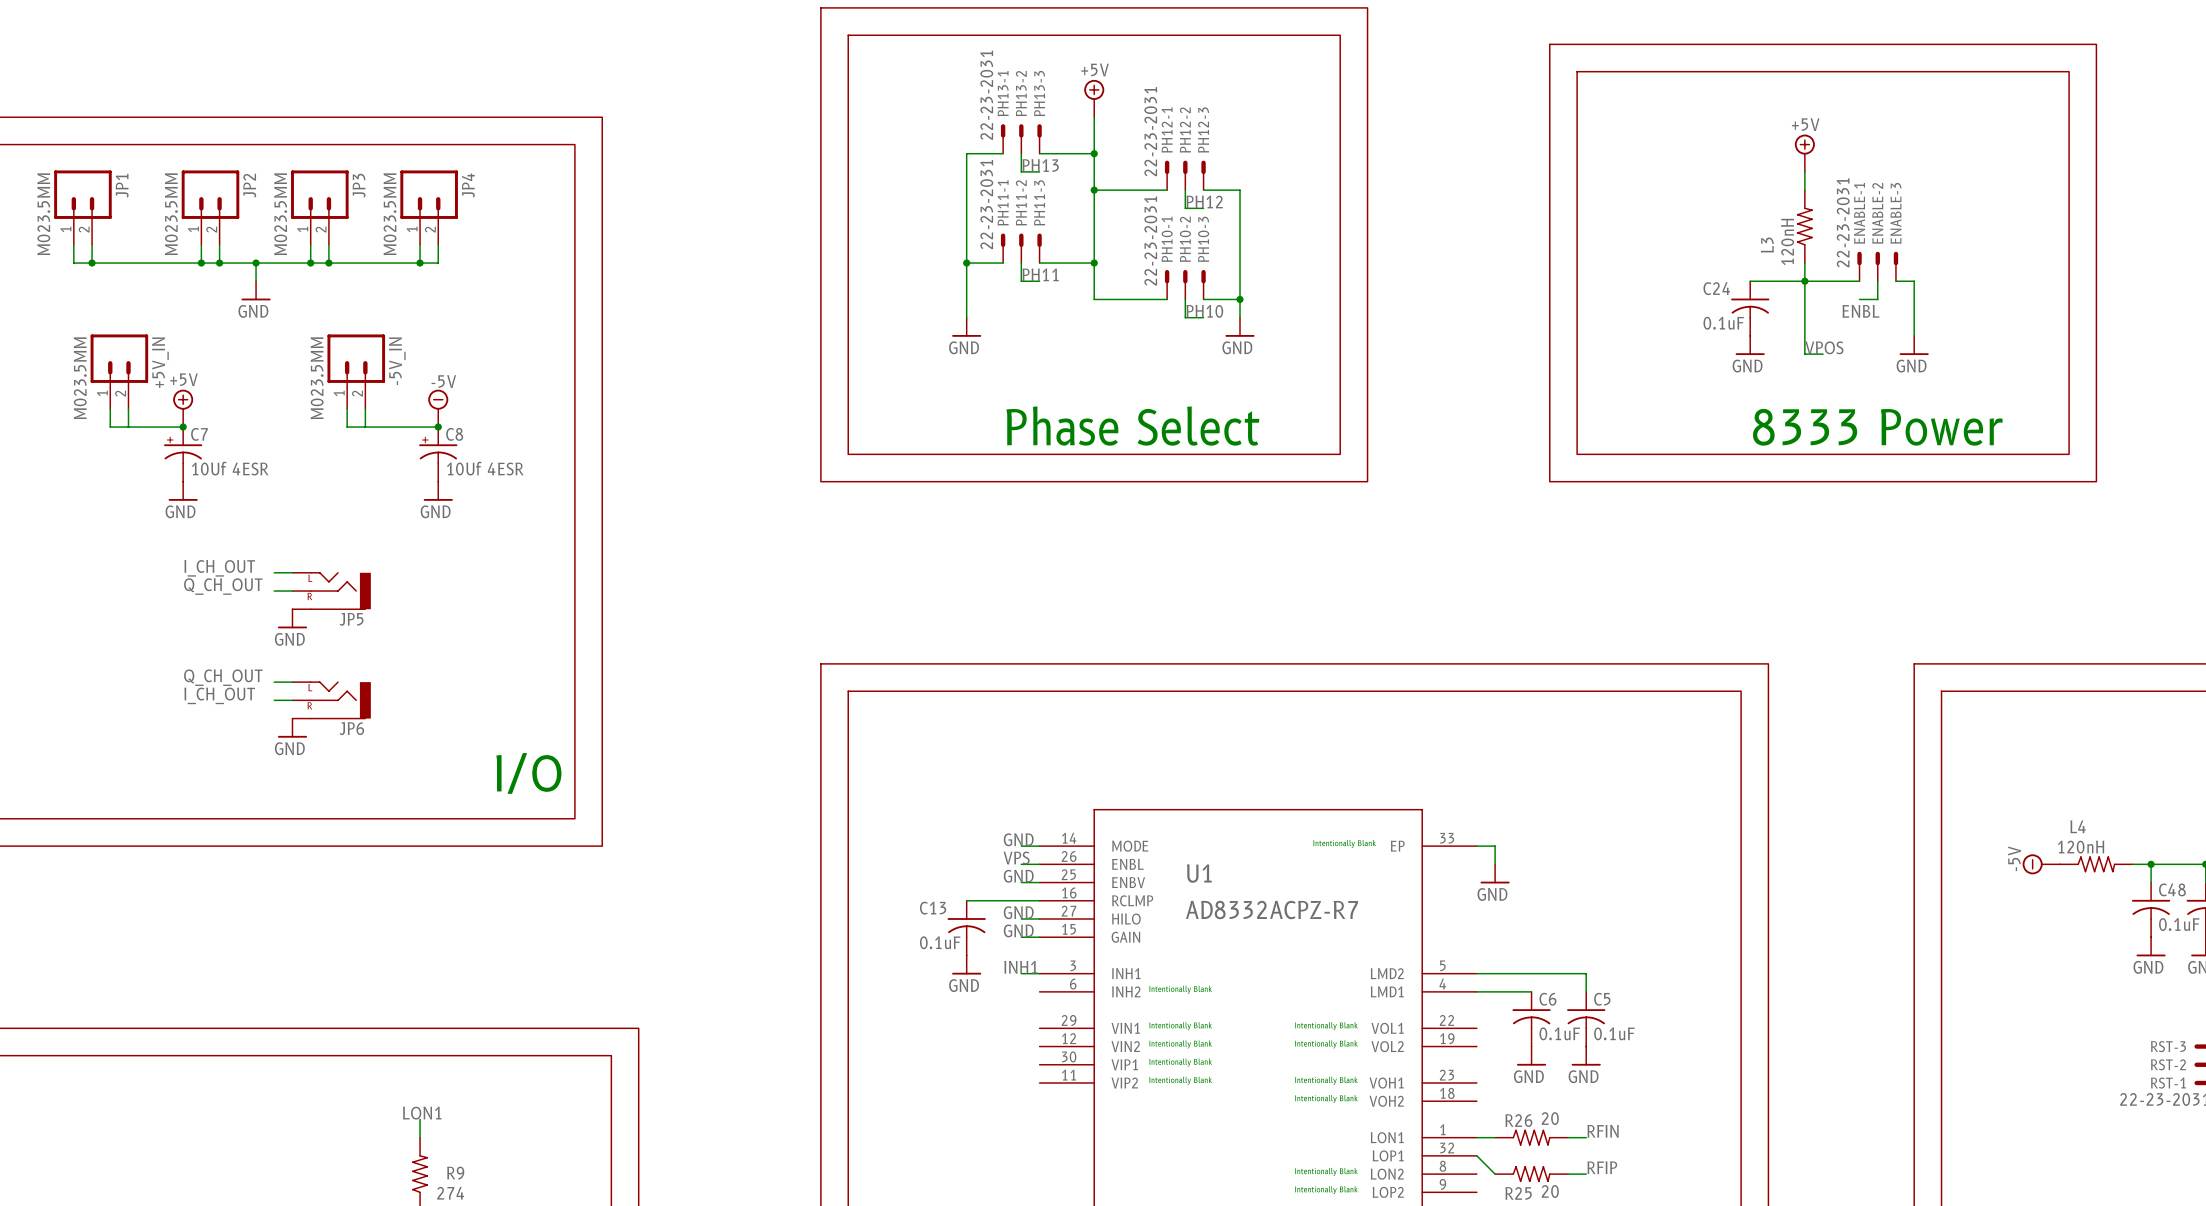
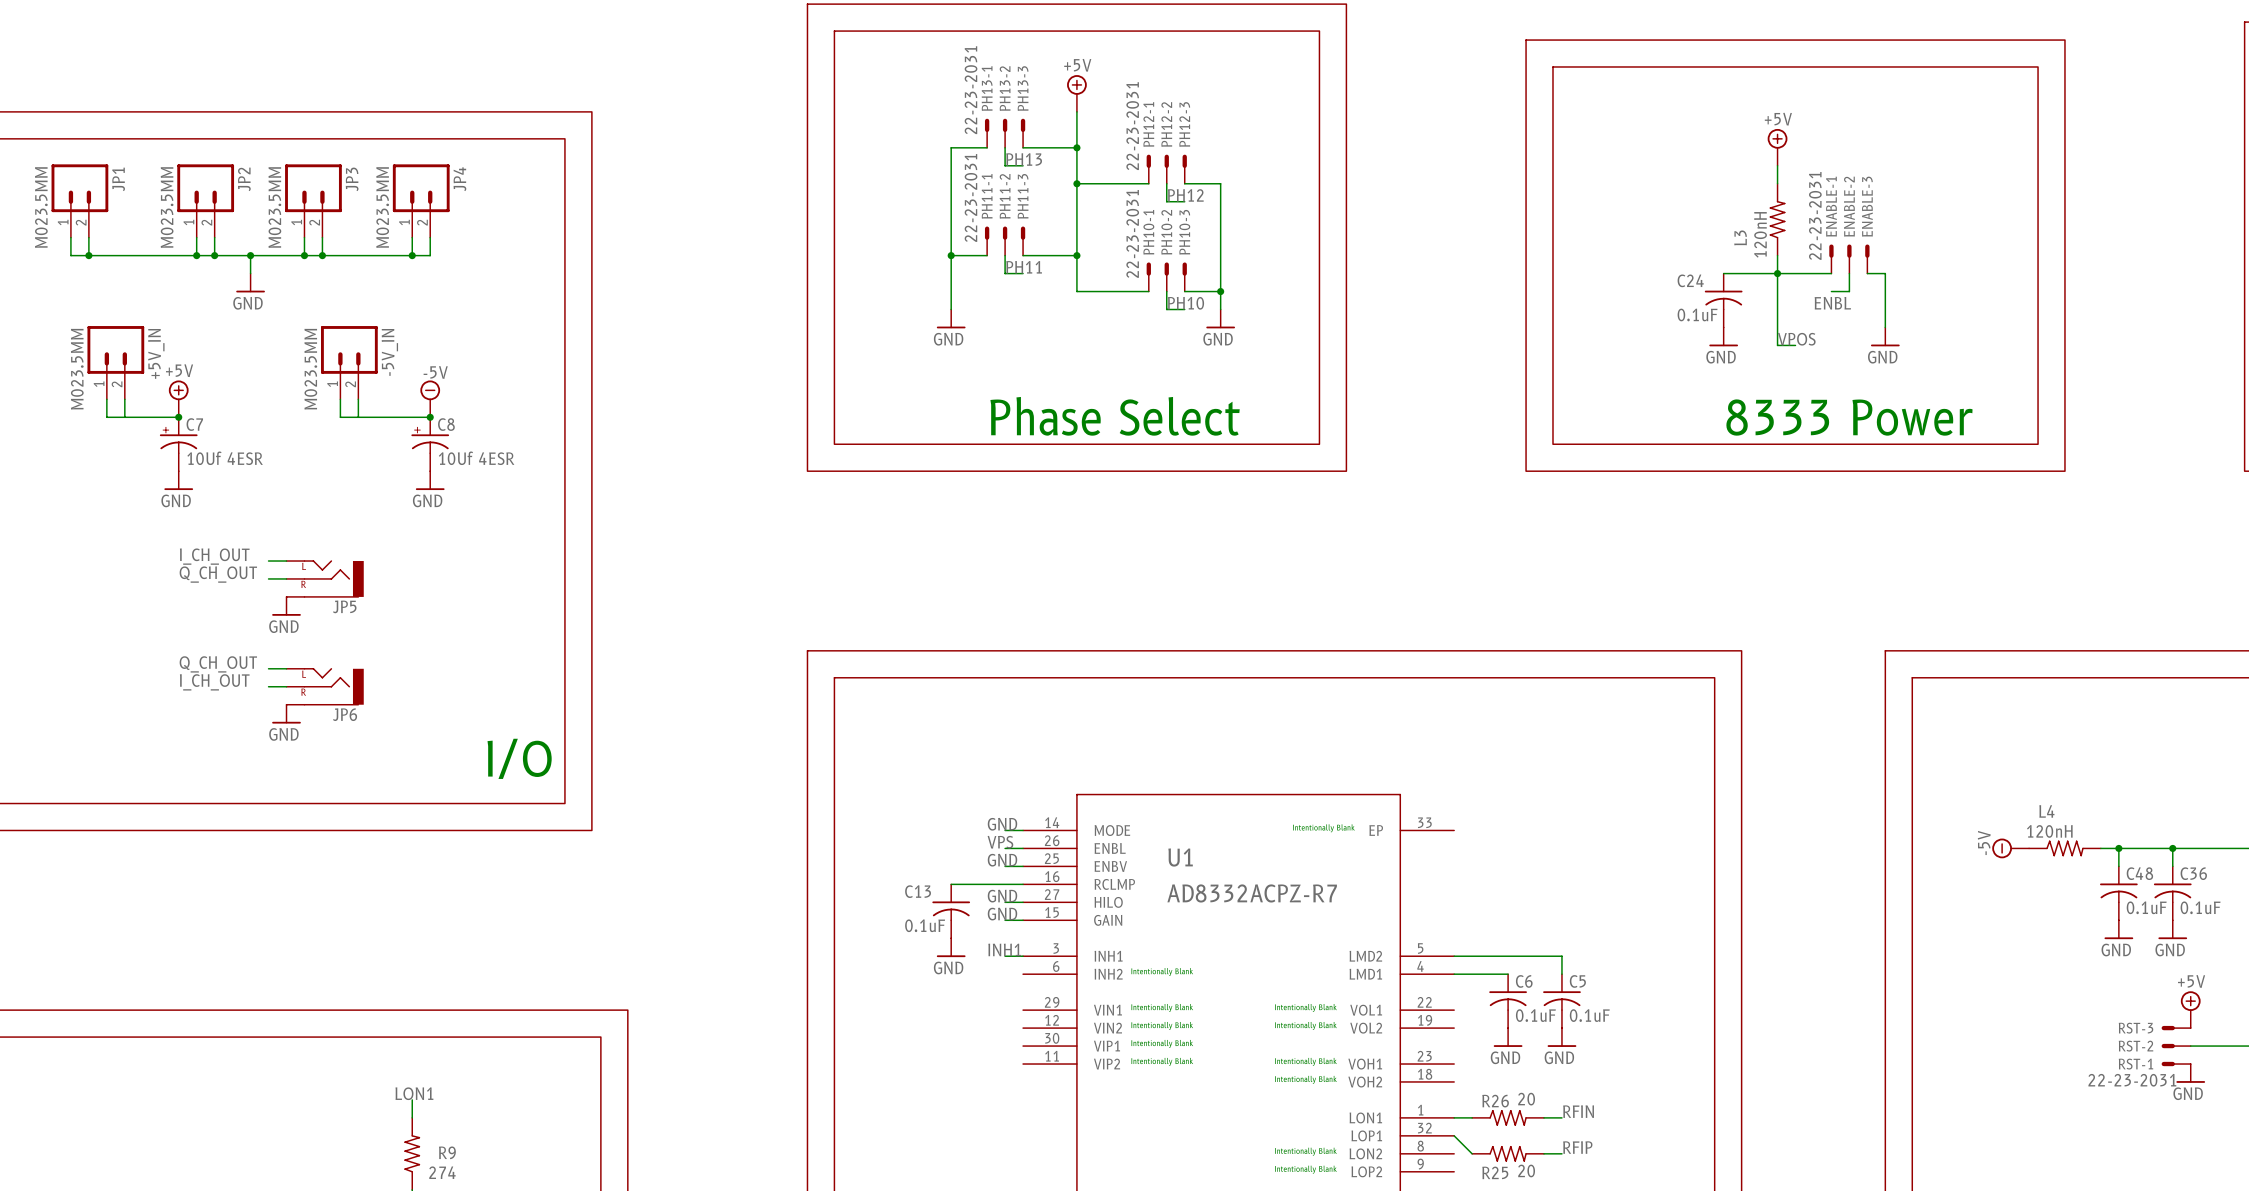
wire: (1476, 846) (1495, 846) (1495, 864) -> none
power symbol: GND (1495, 873) -> none

